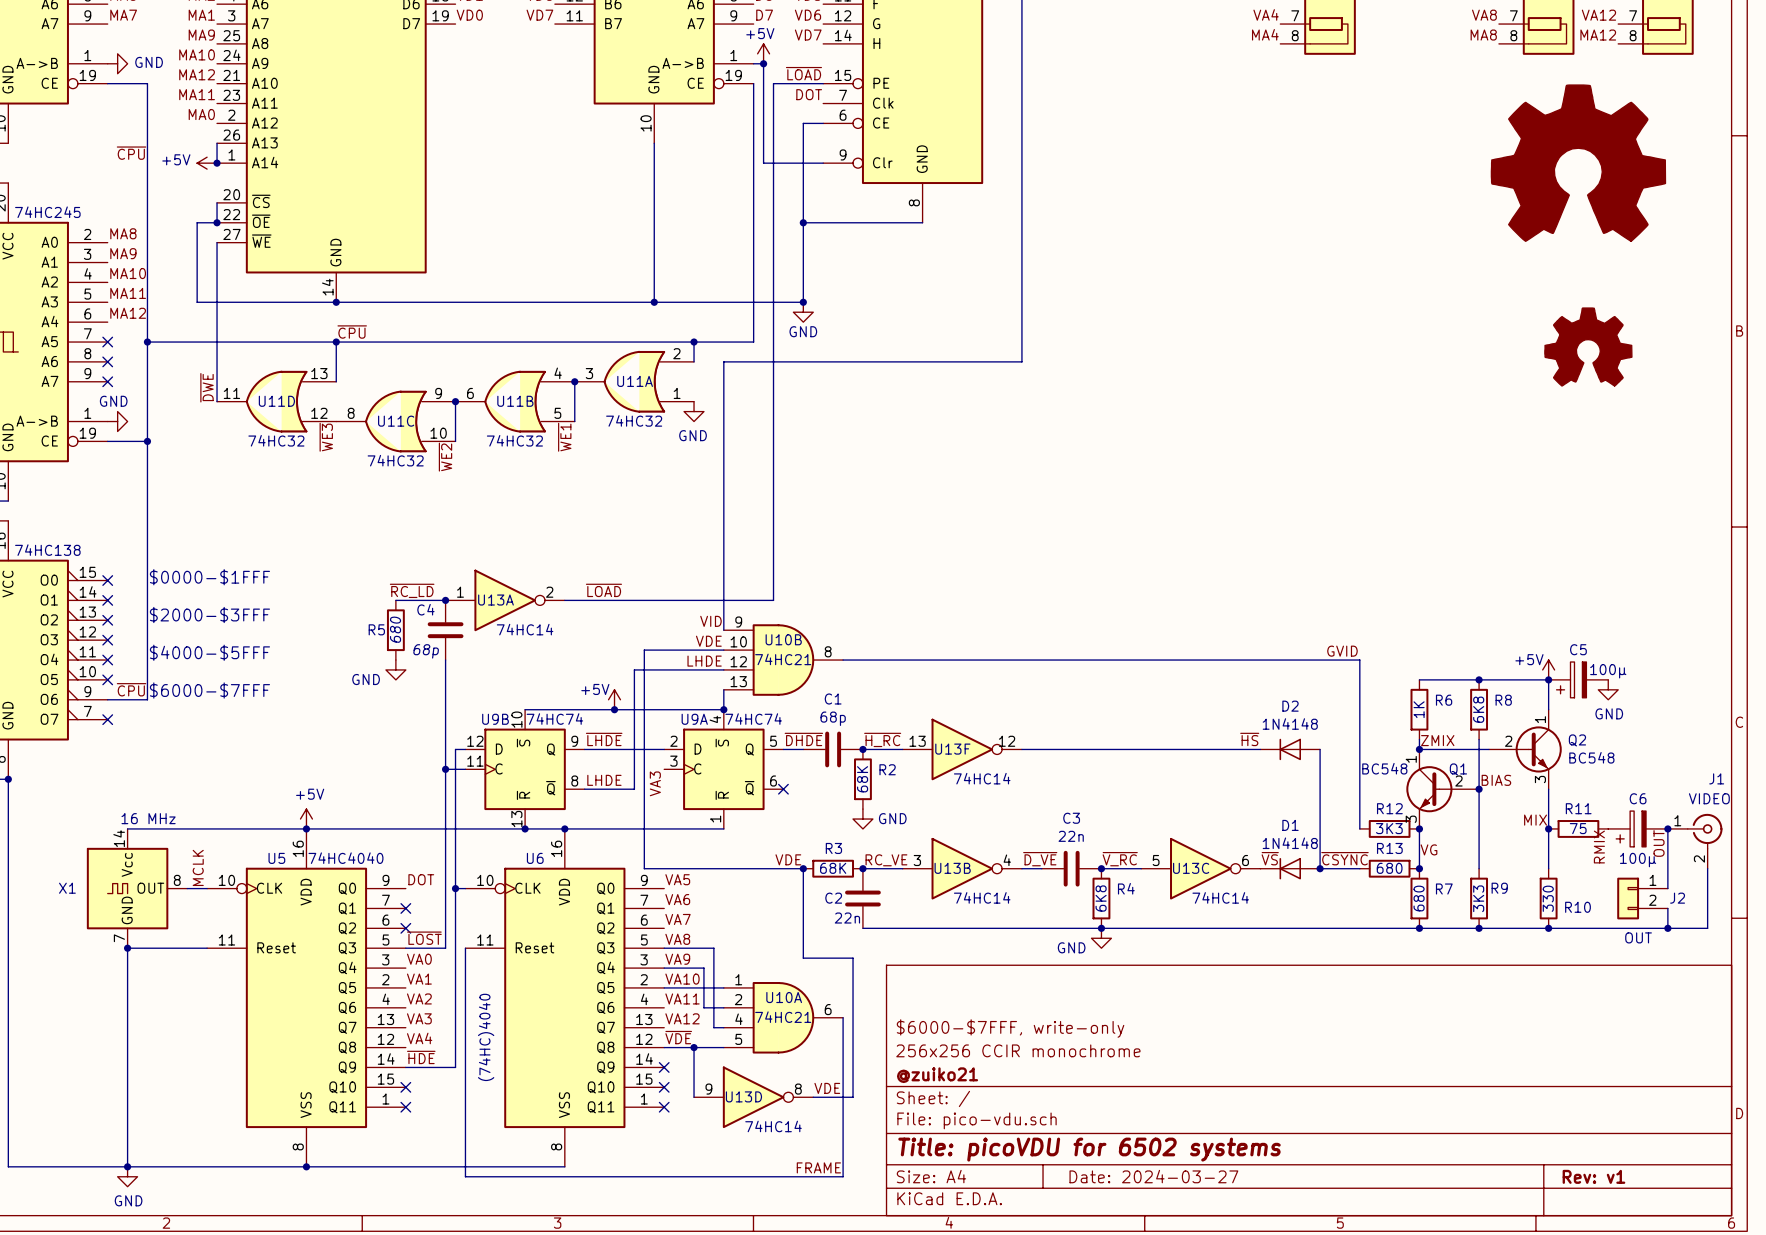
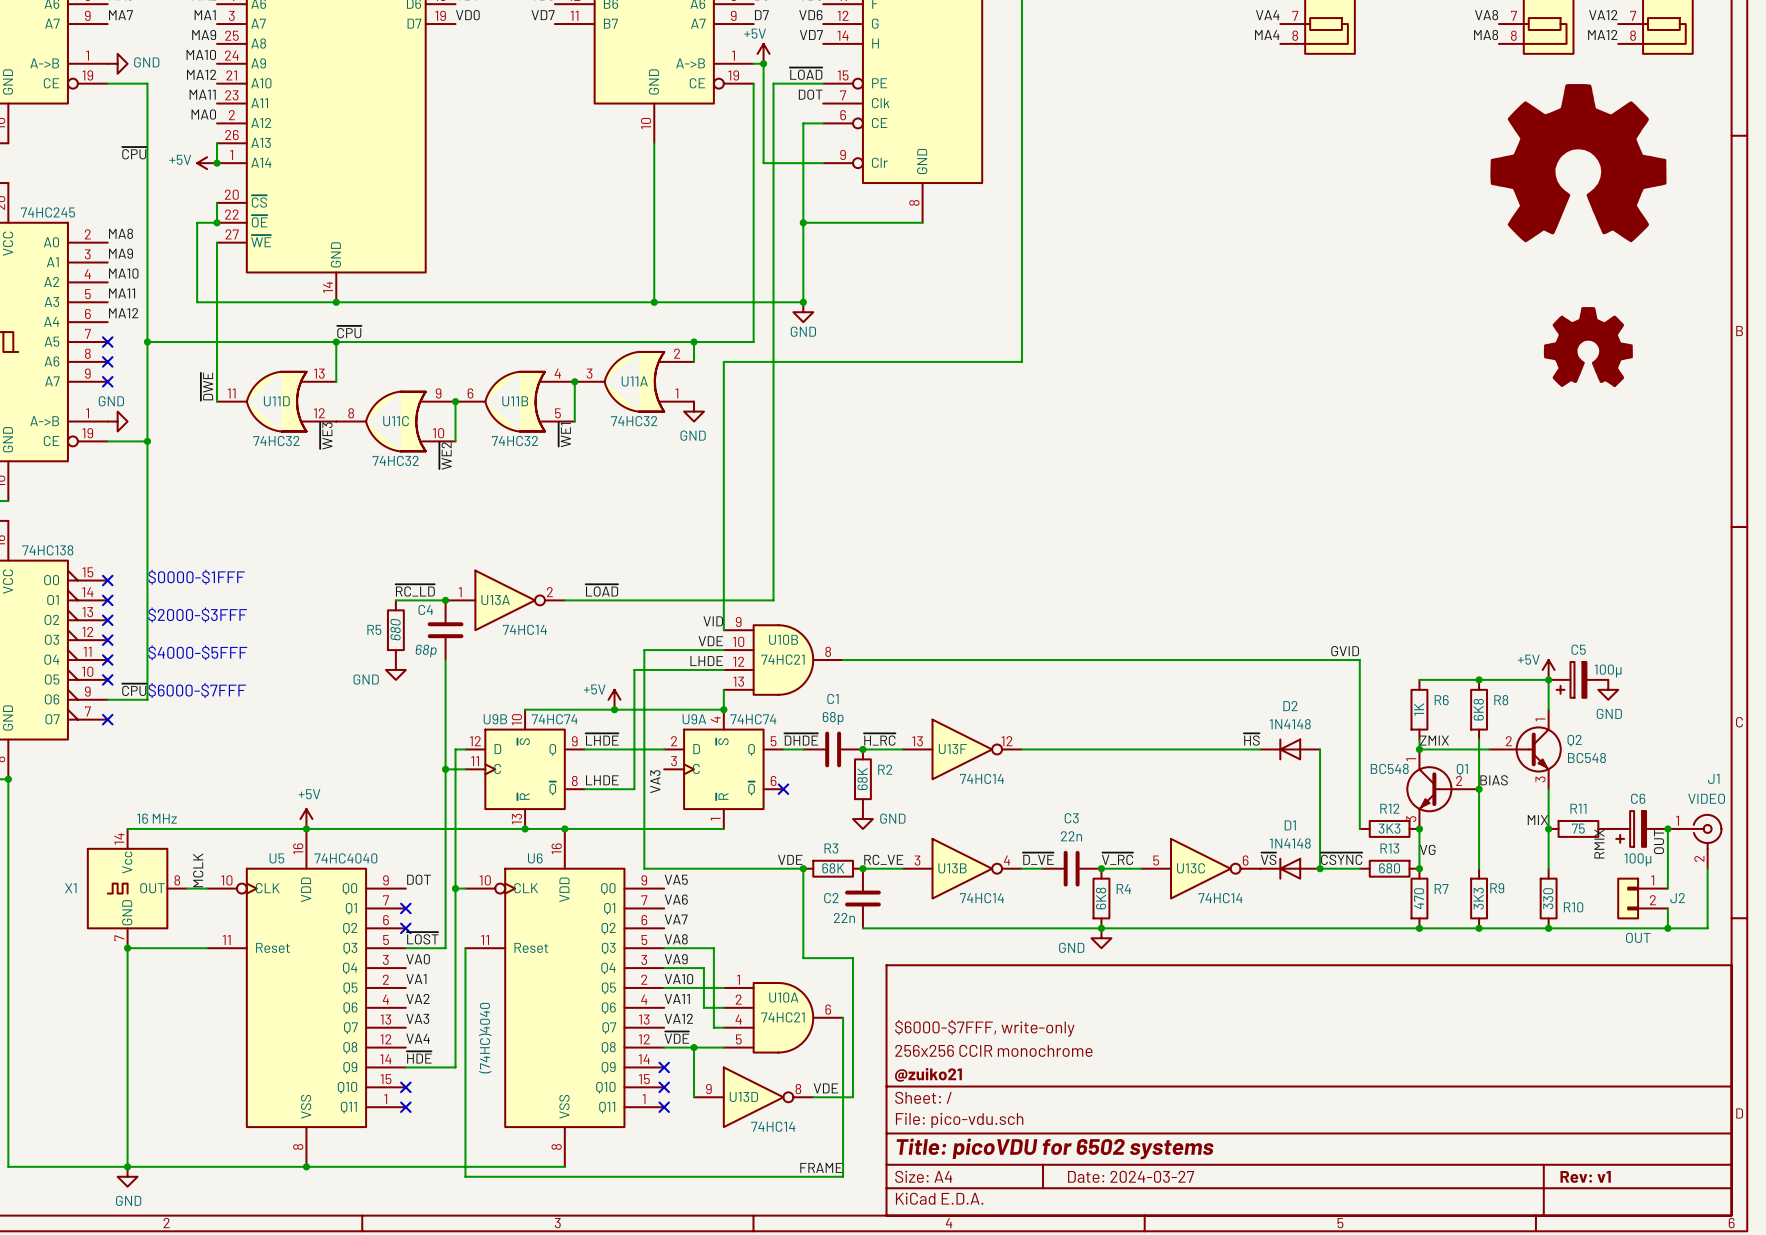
R7 value: 680 (1419, 898) -> 470 (1419, 898)

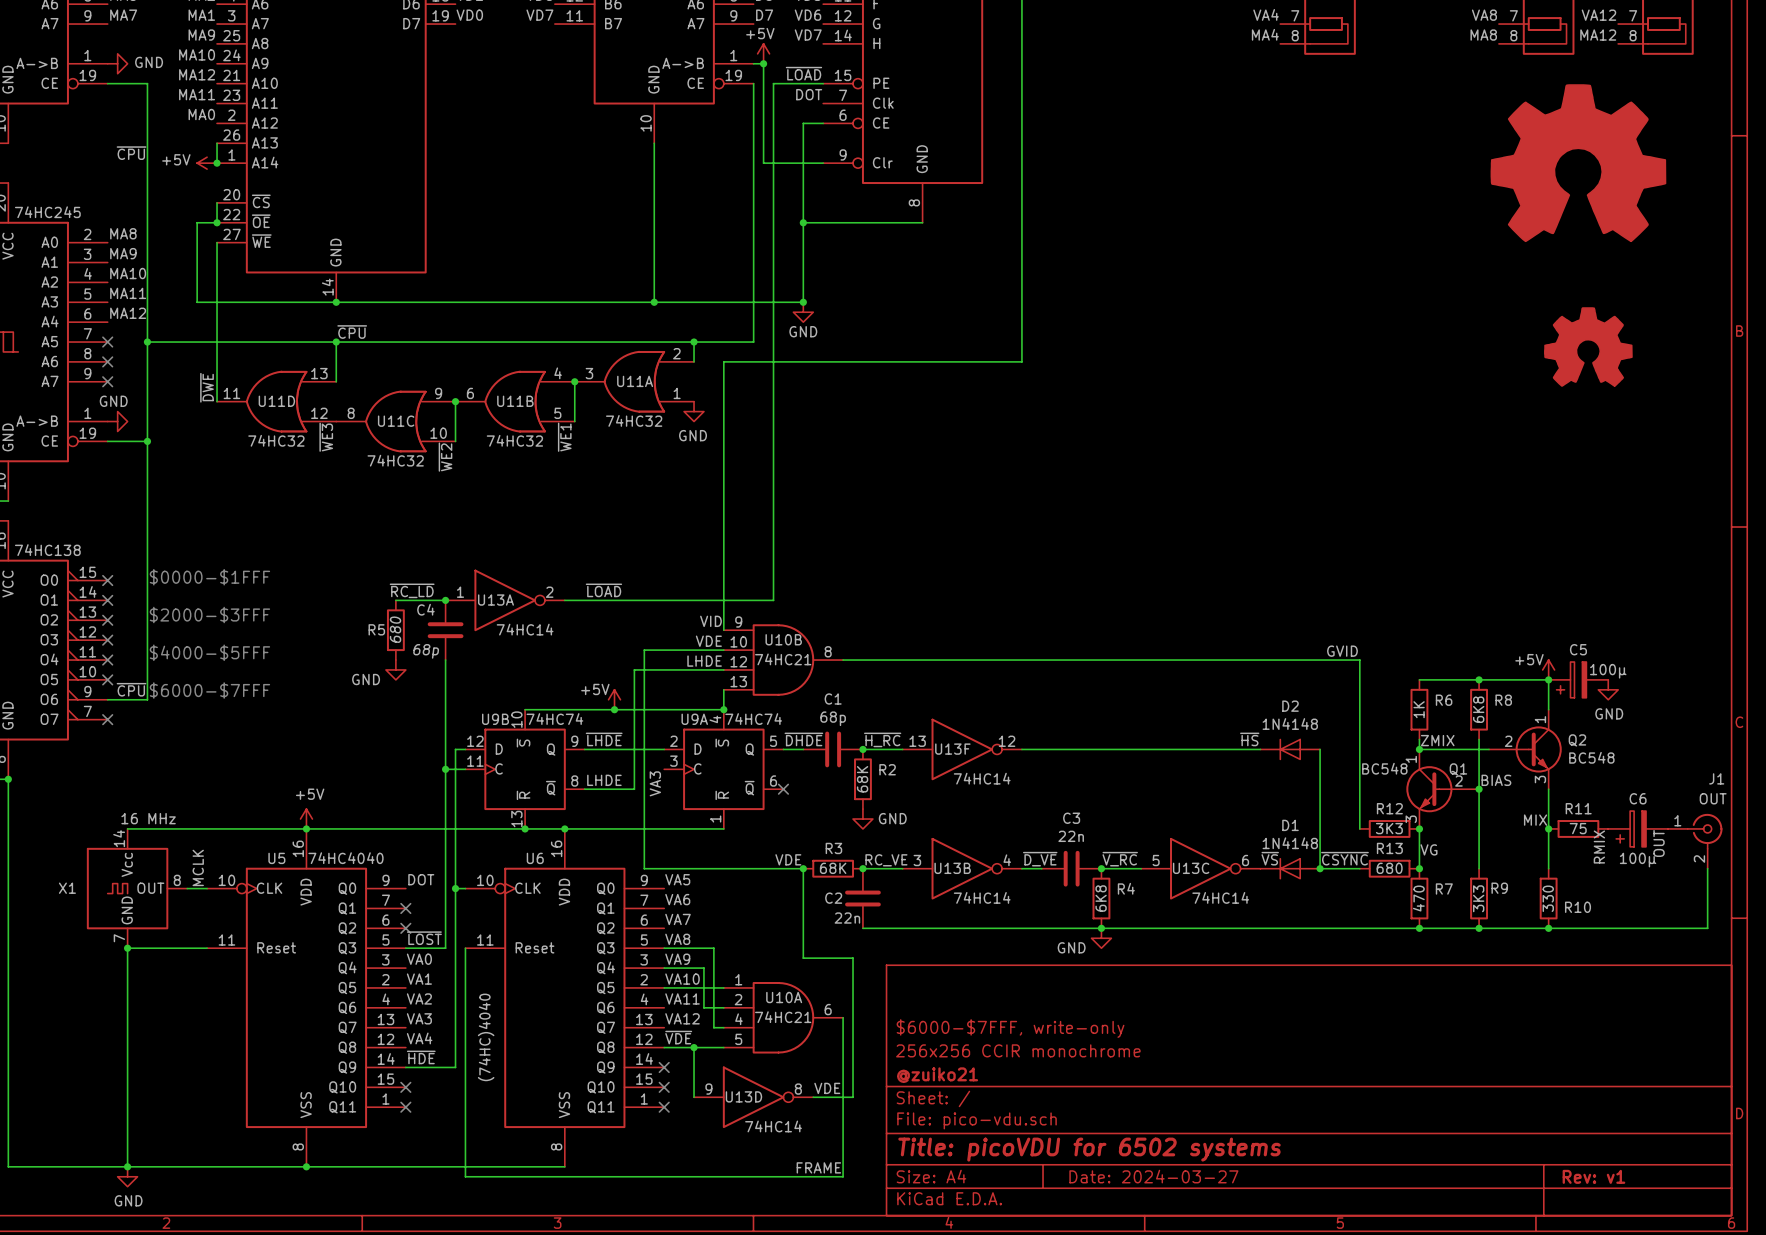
J1 value: VIDEO (1706, 798) -> OUT (1713, 798)
wire: (1667, 828) (1667, 888) -> none
junction: (1667, 828) -> none
J2: OUT (1642, 898) -> none
wire: (1667, 908) (1667, 928) -> none
junction: (1667, 928) -> none

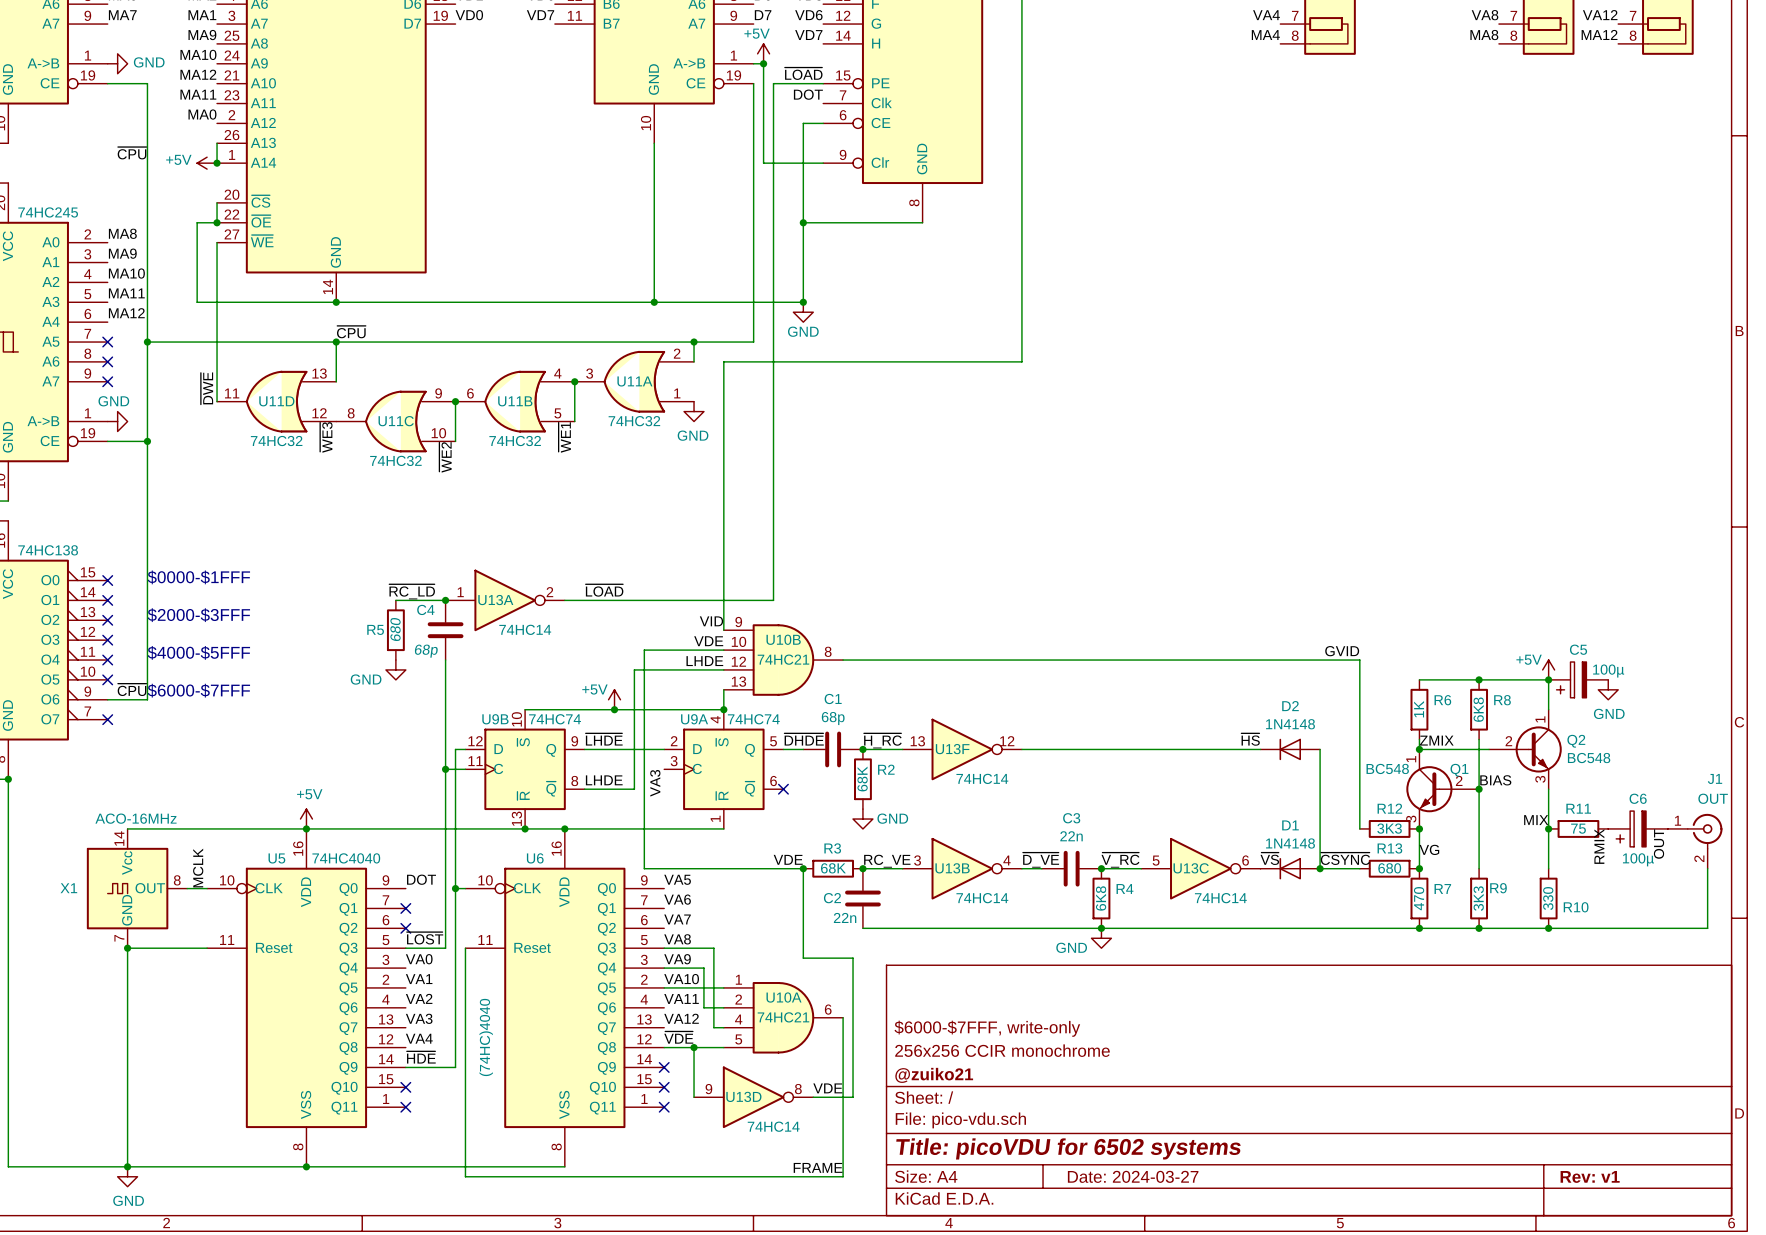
part: (1578, 163) -> none
part: (1588, 346) -> none
X1 value: 16 MHz (148, 818) -> ACO-16MHz (135, 818)

